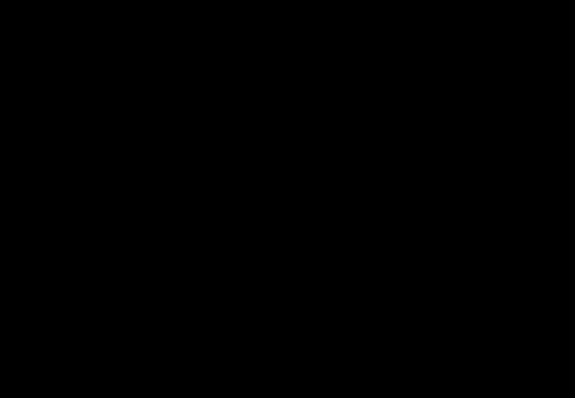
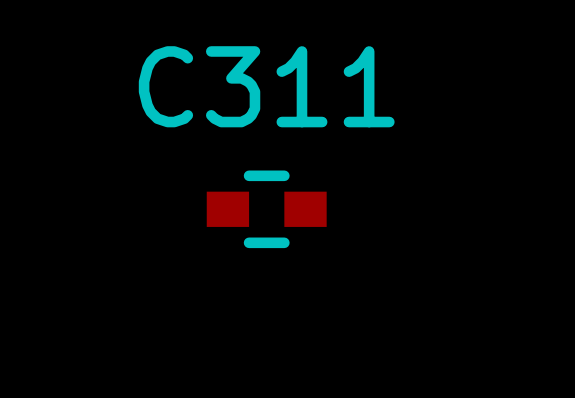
C311: none -> (266, 209)

